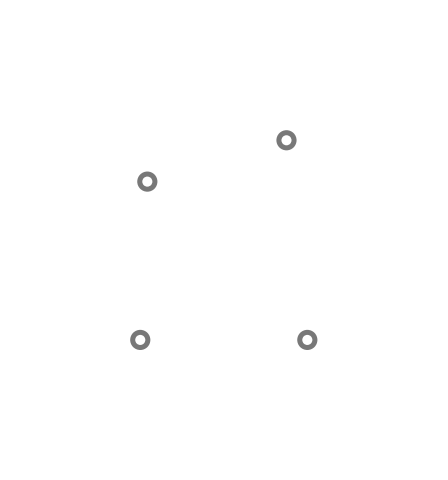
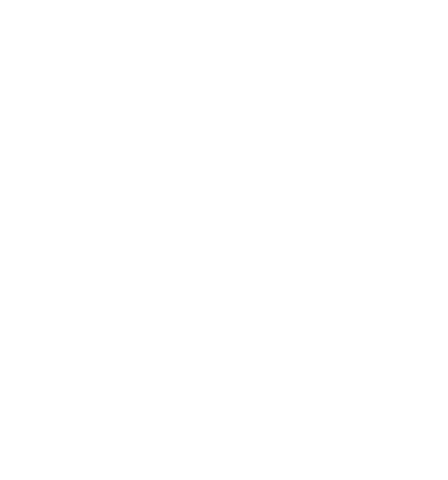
via: (286, 140) -> none
via: (147, 181) -> none
via: (140, 339) -> none
via: (307, 339) -> none

